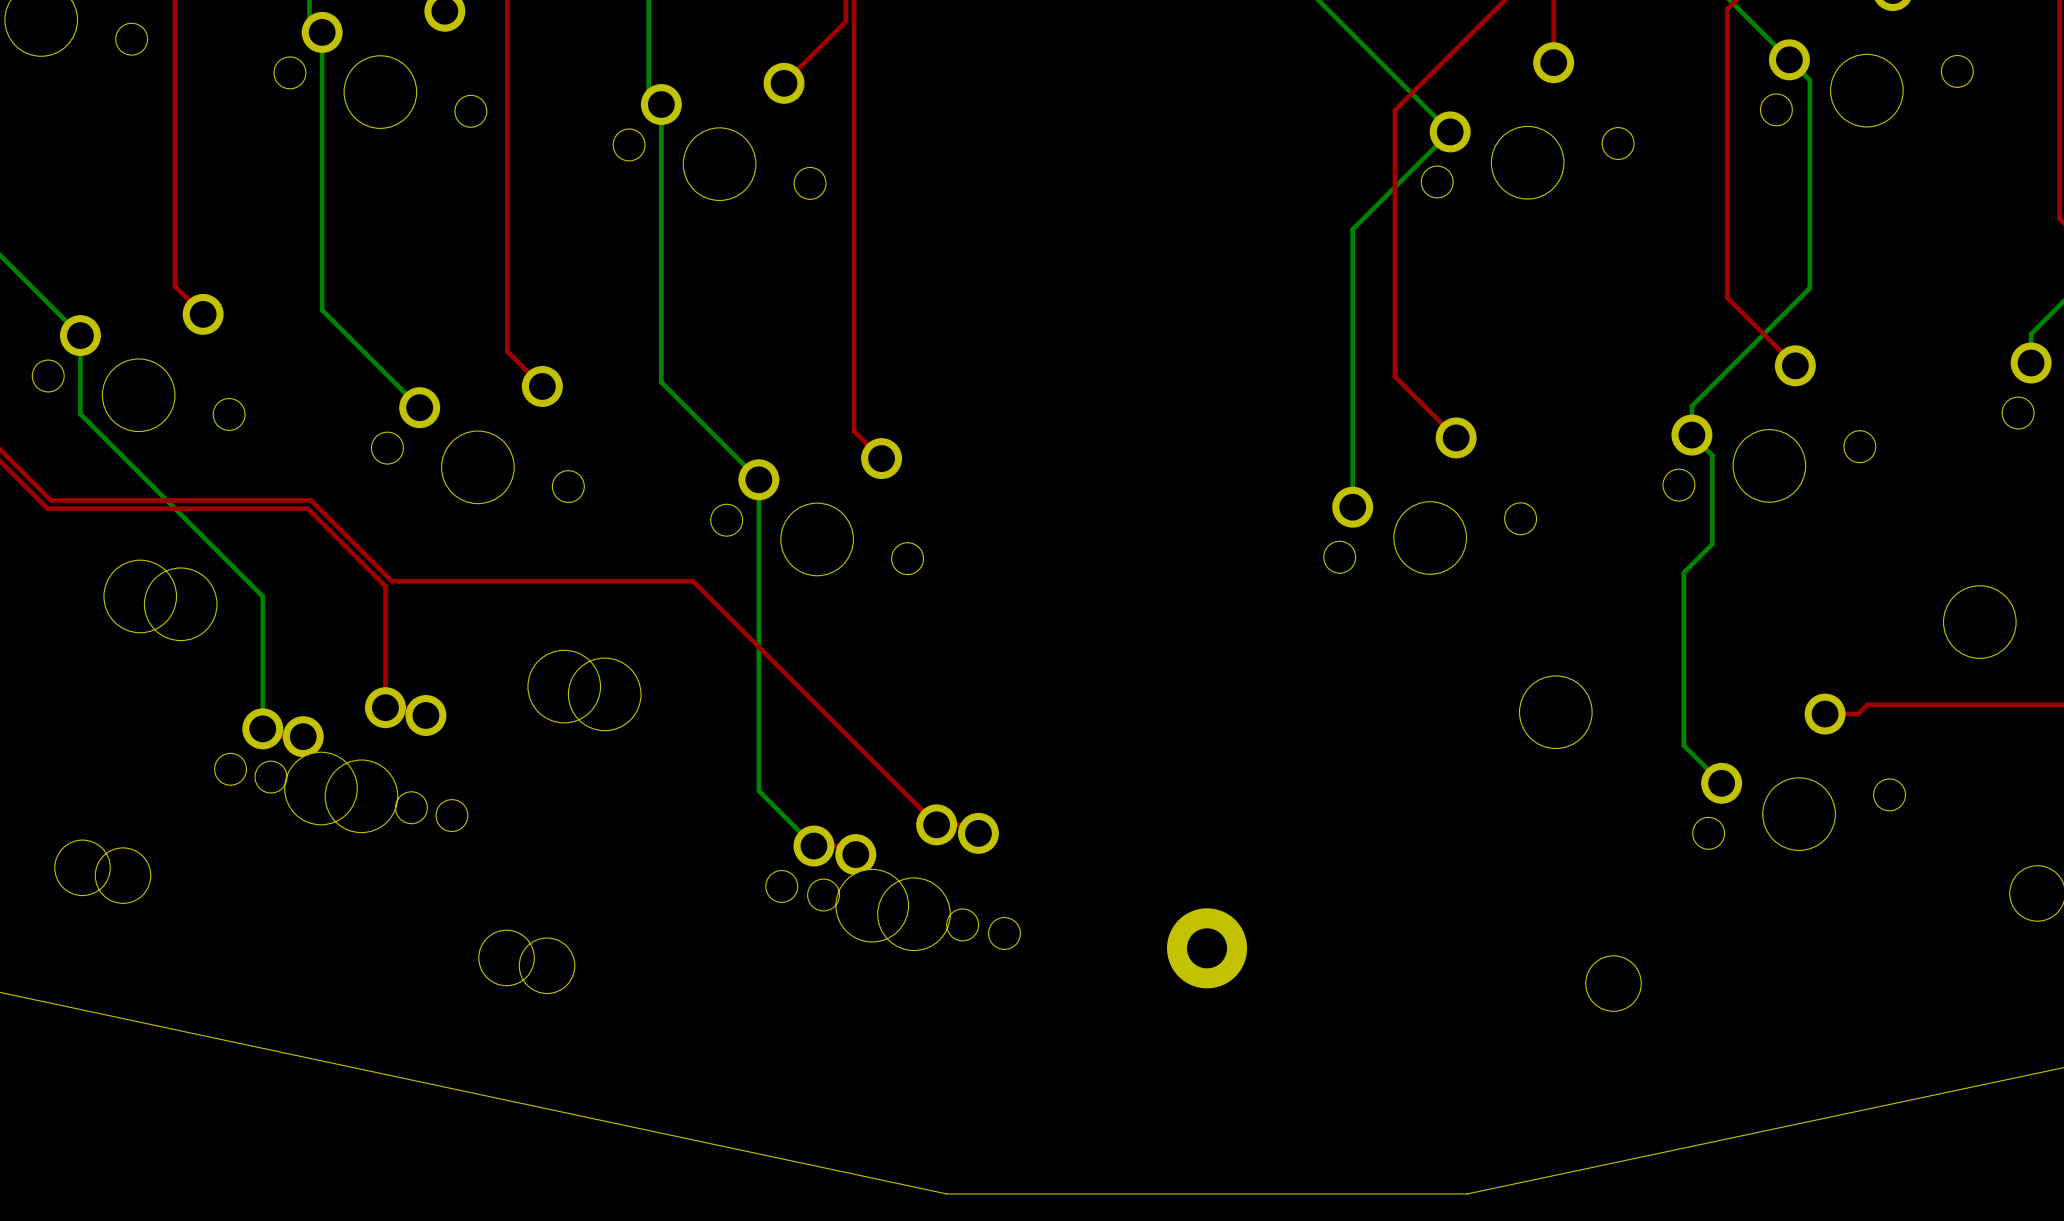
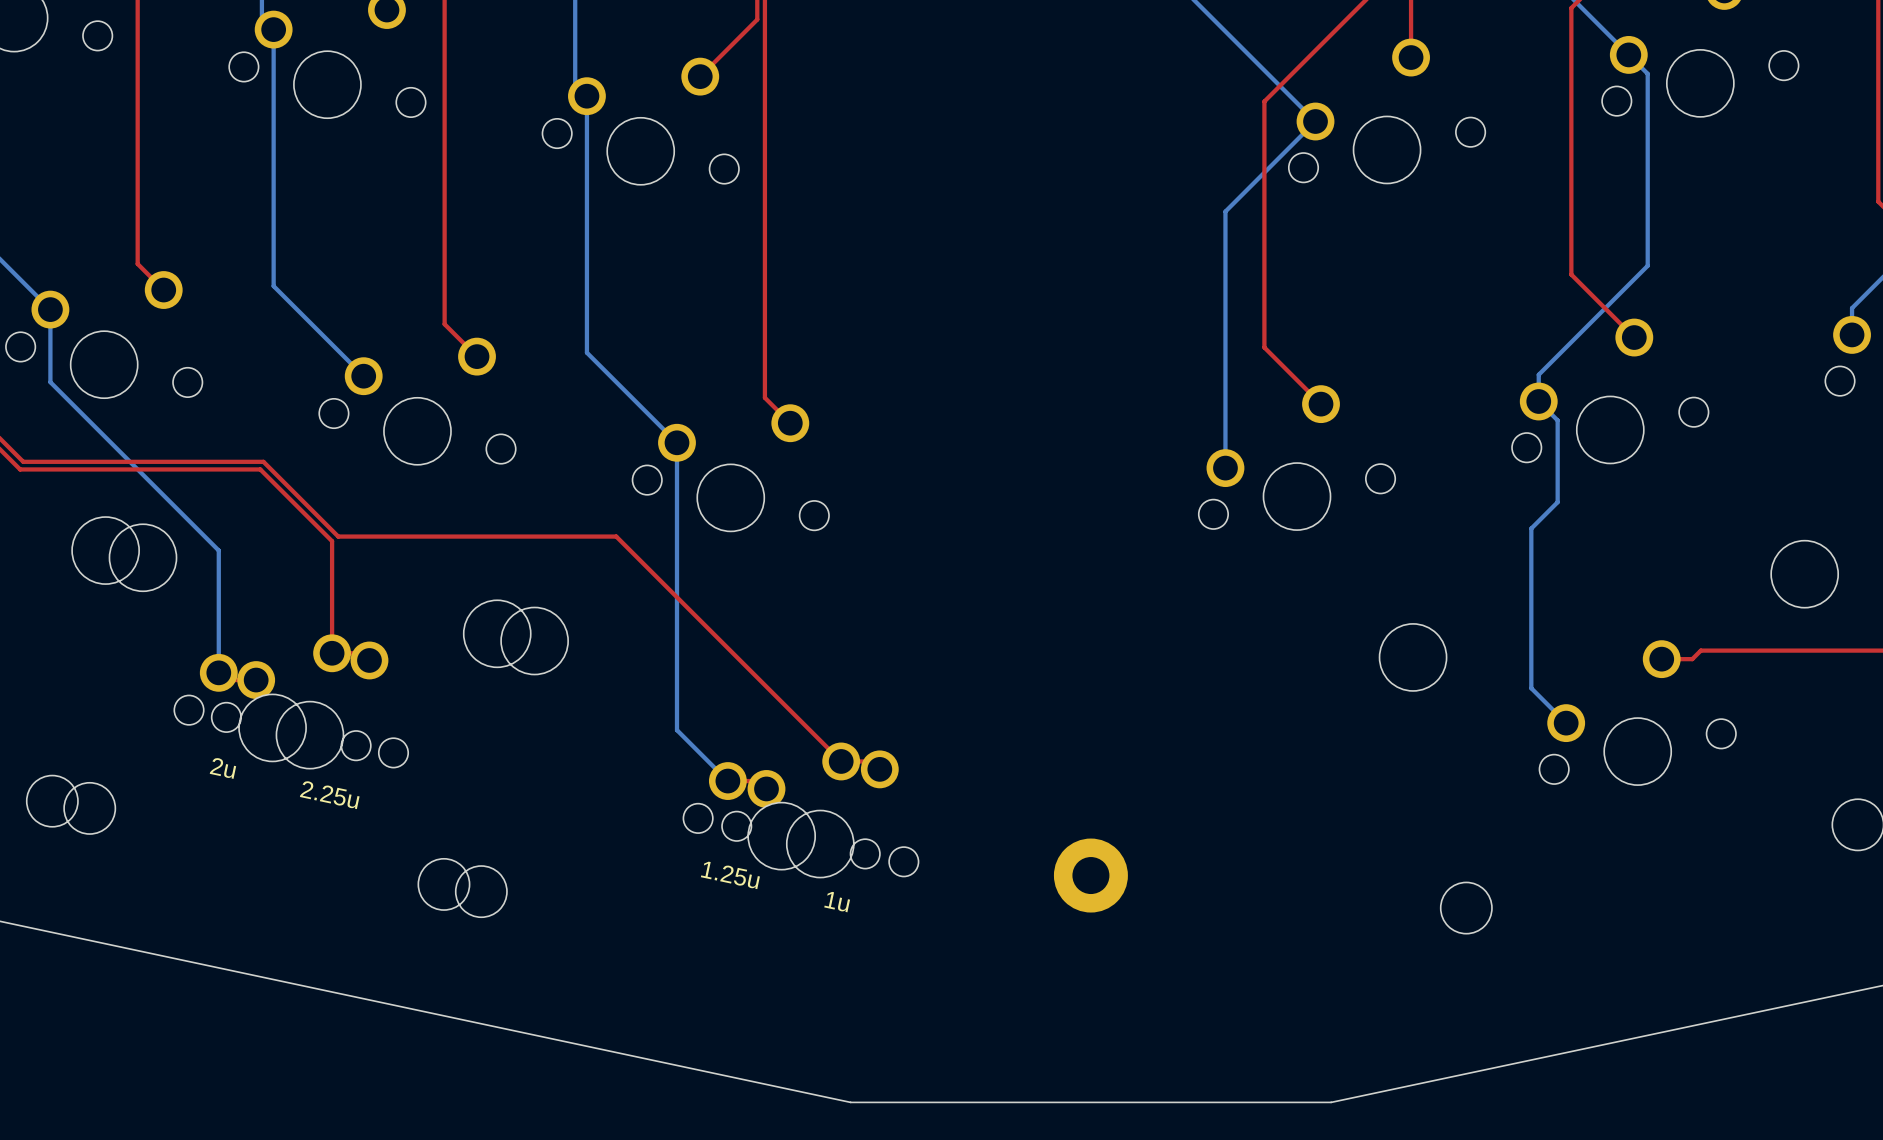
text: none -> 2u (222, 768)
text: none -> 2.25u (329, 795)
text: none -> 1.25u (730, 875)
text: none -> 1u (837, 902)

